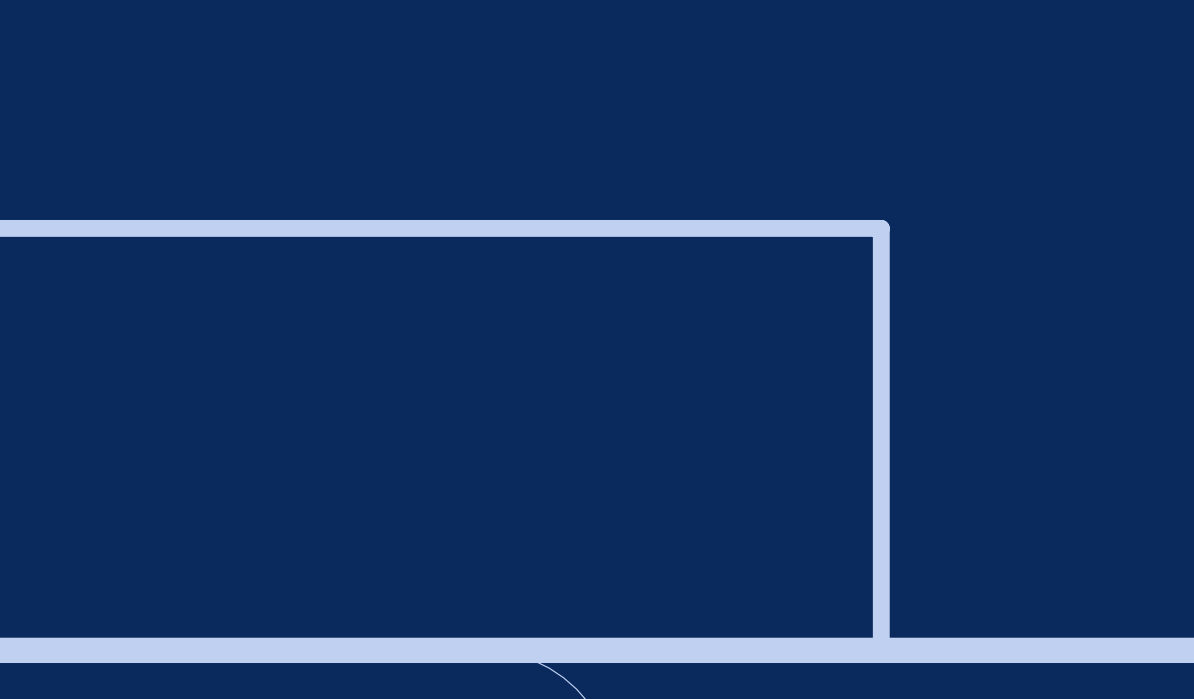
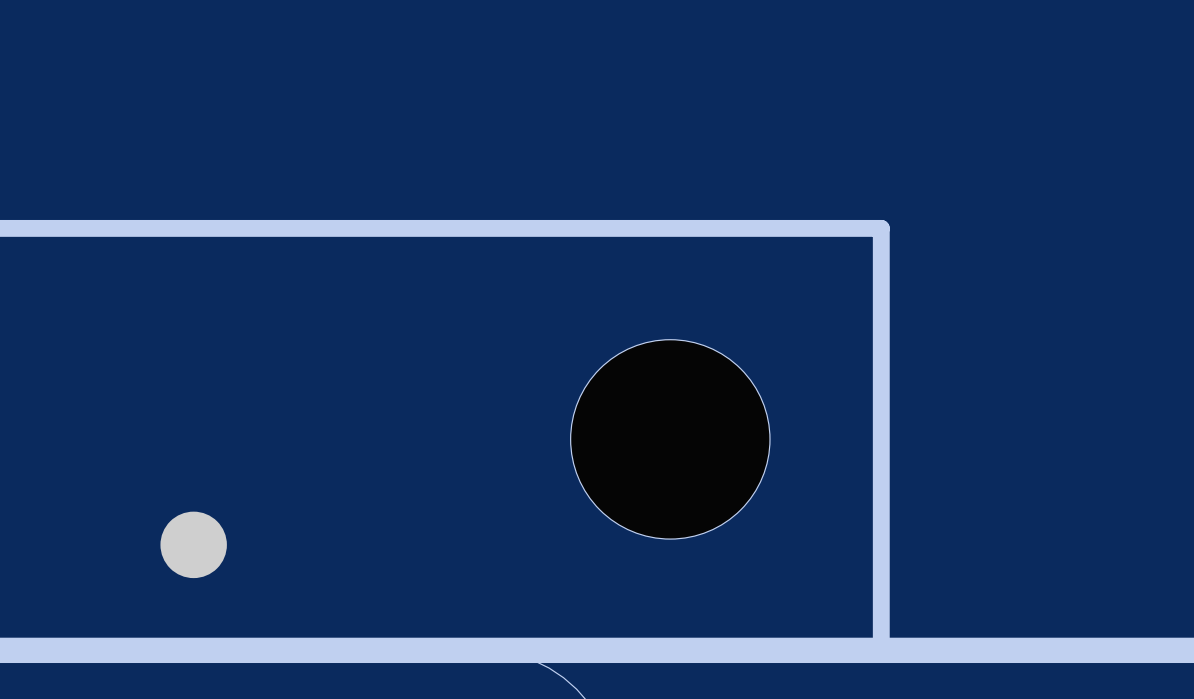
hole: none -> (670, 439)
part: none -> (193, 544)

